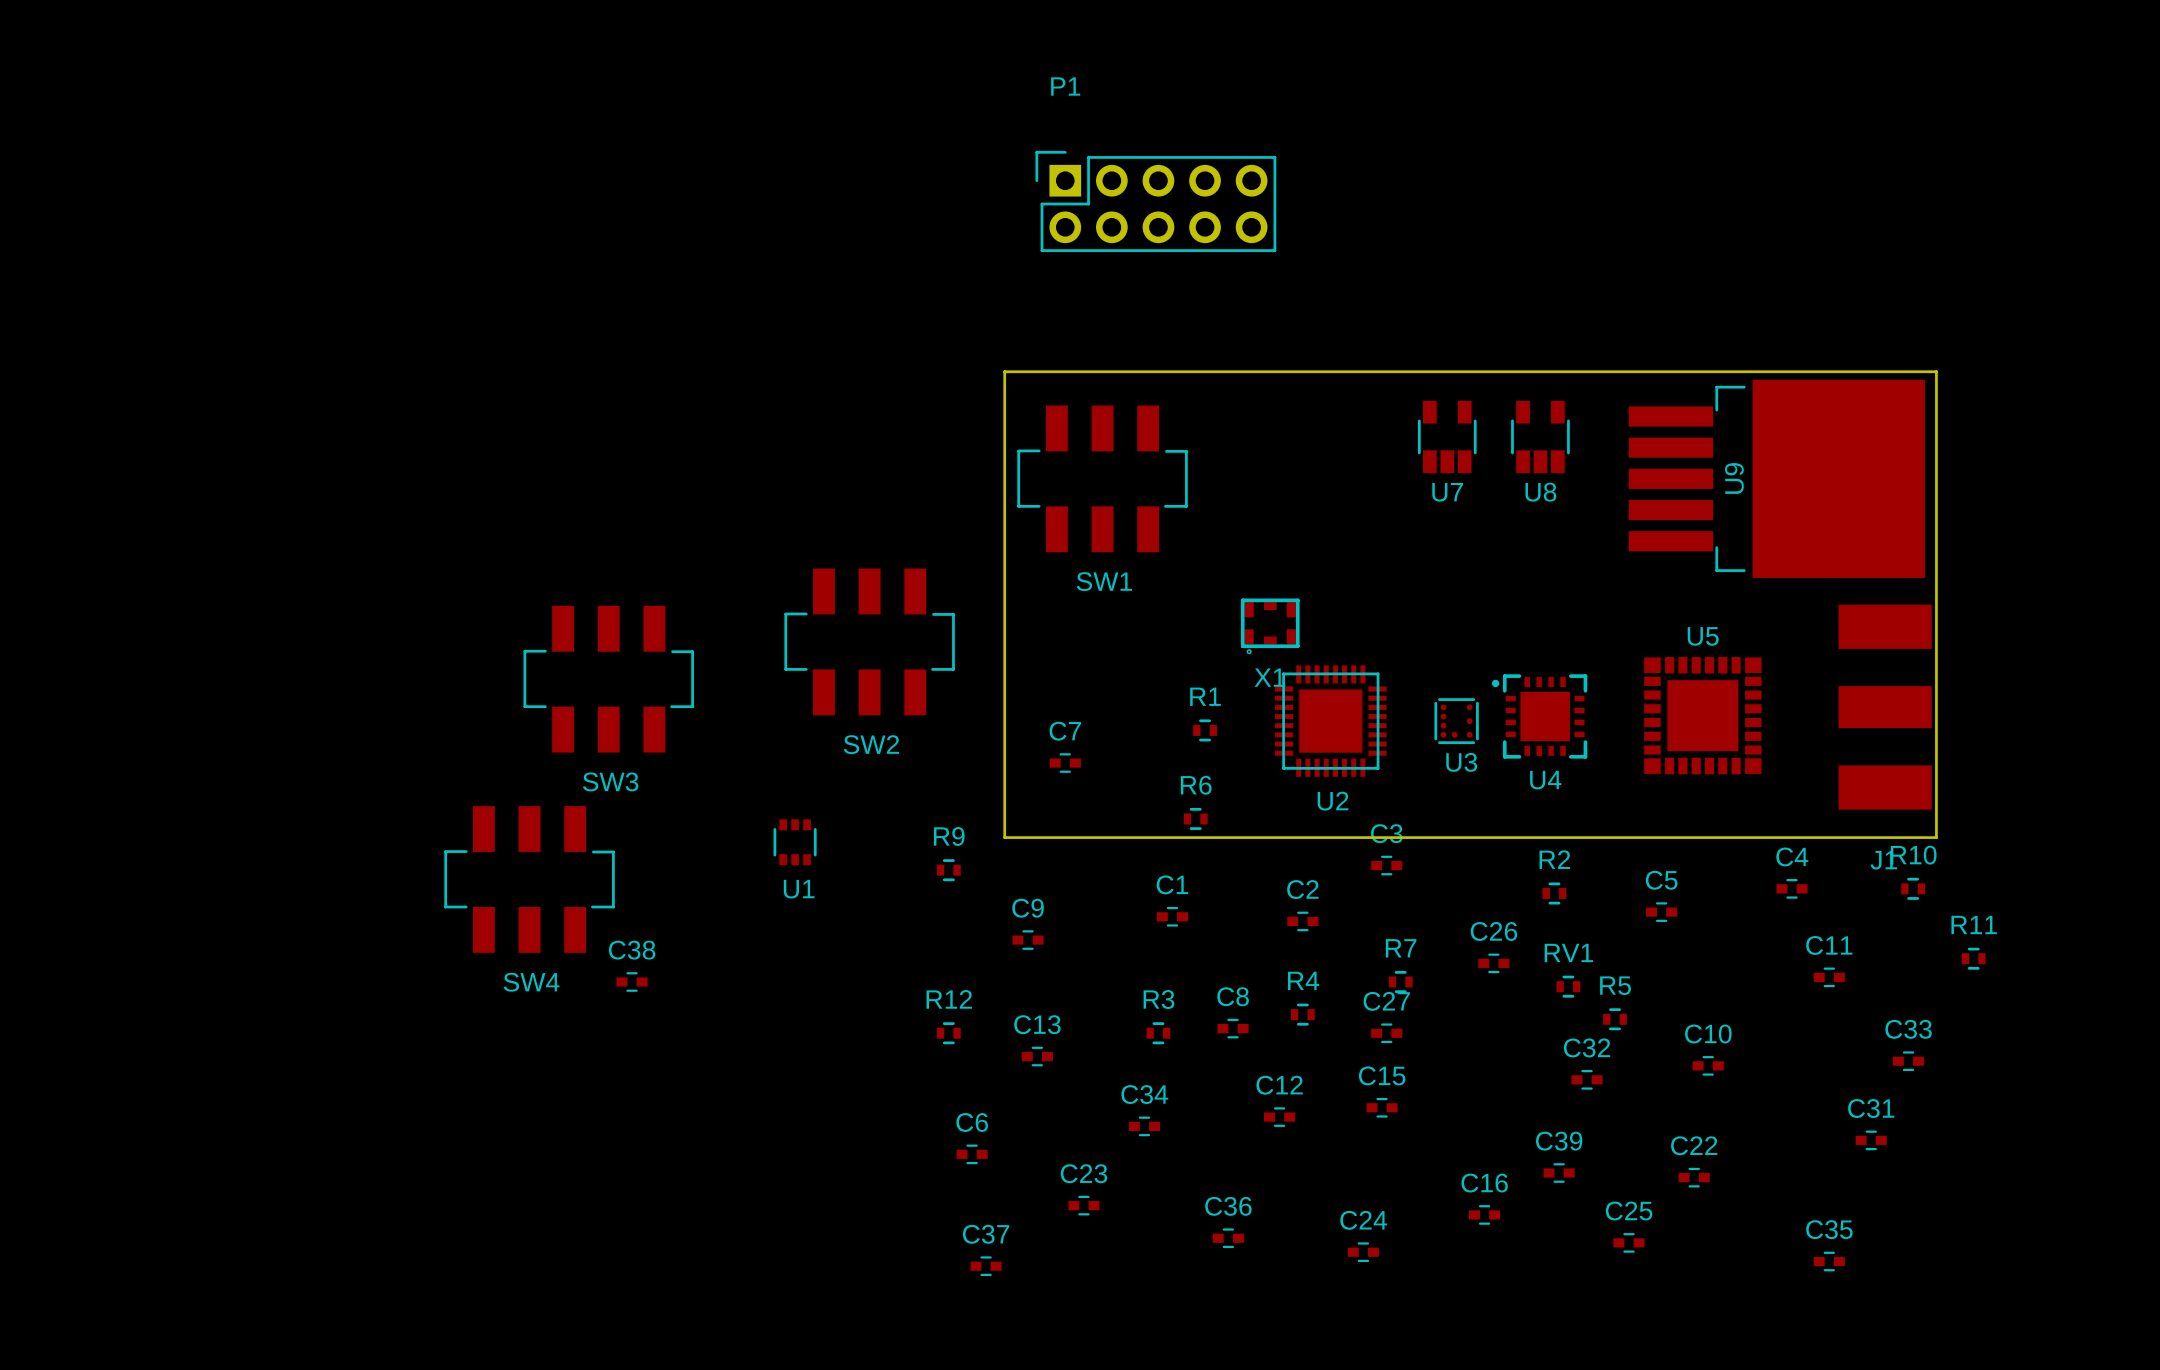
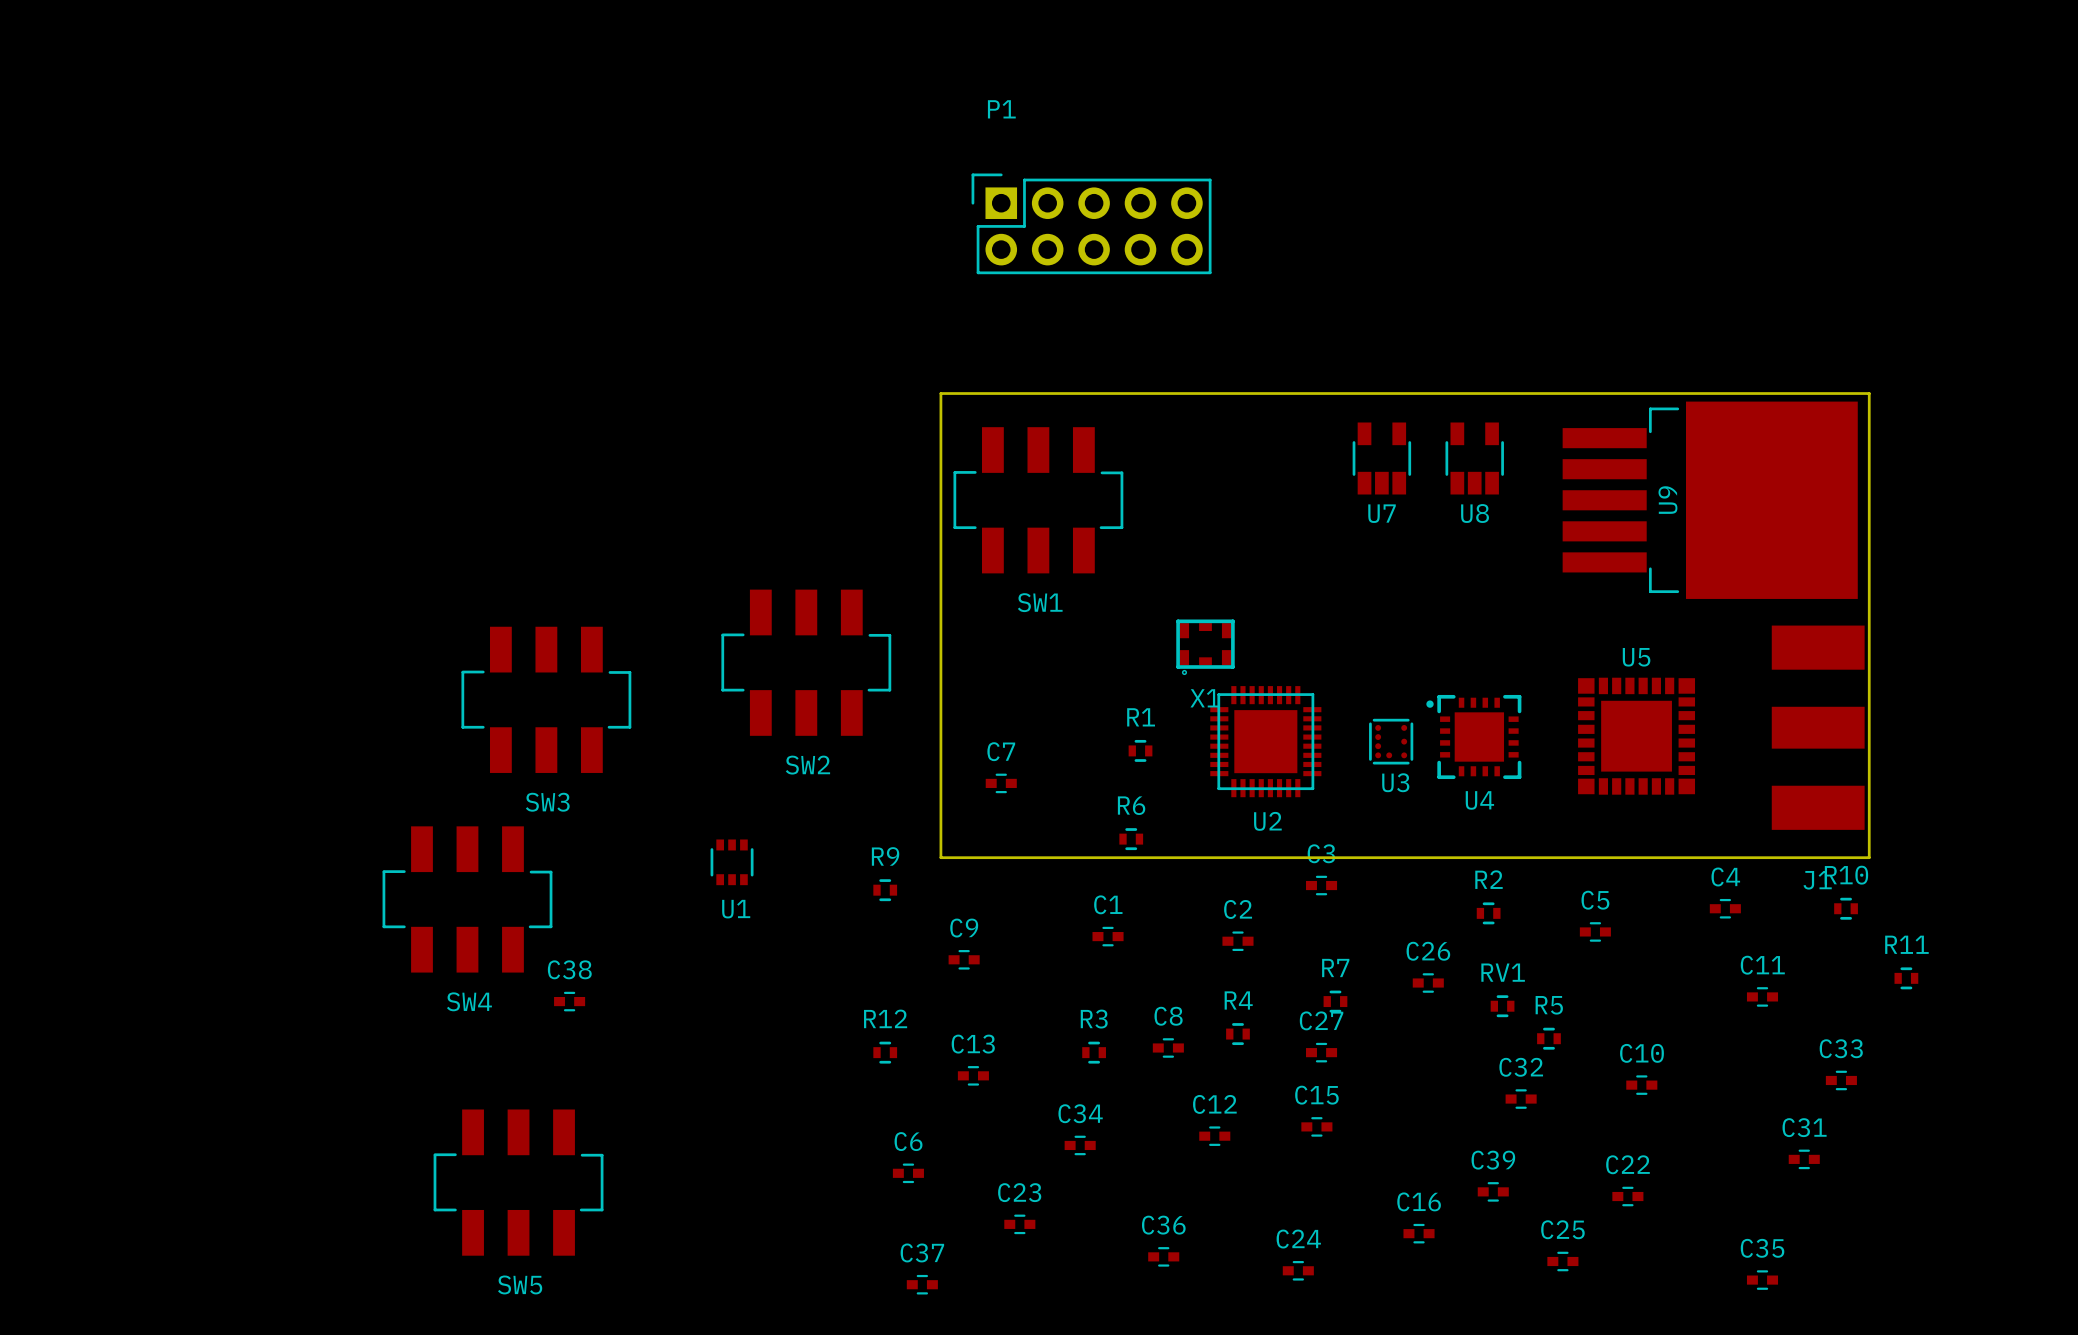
SW5: none -> (518, 1182)

